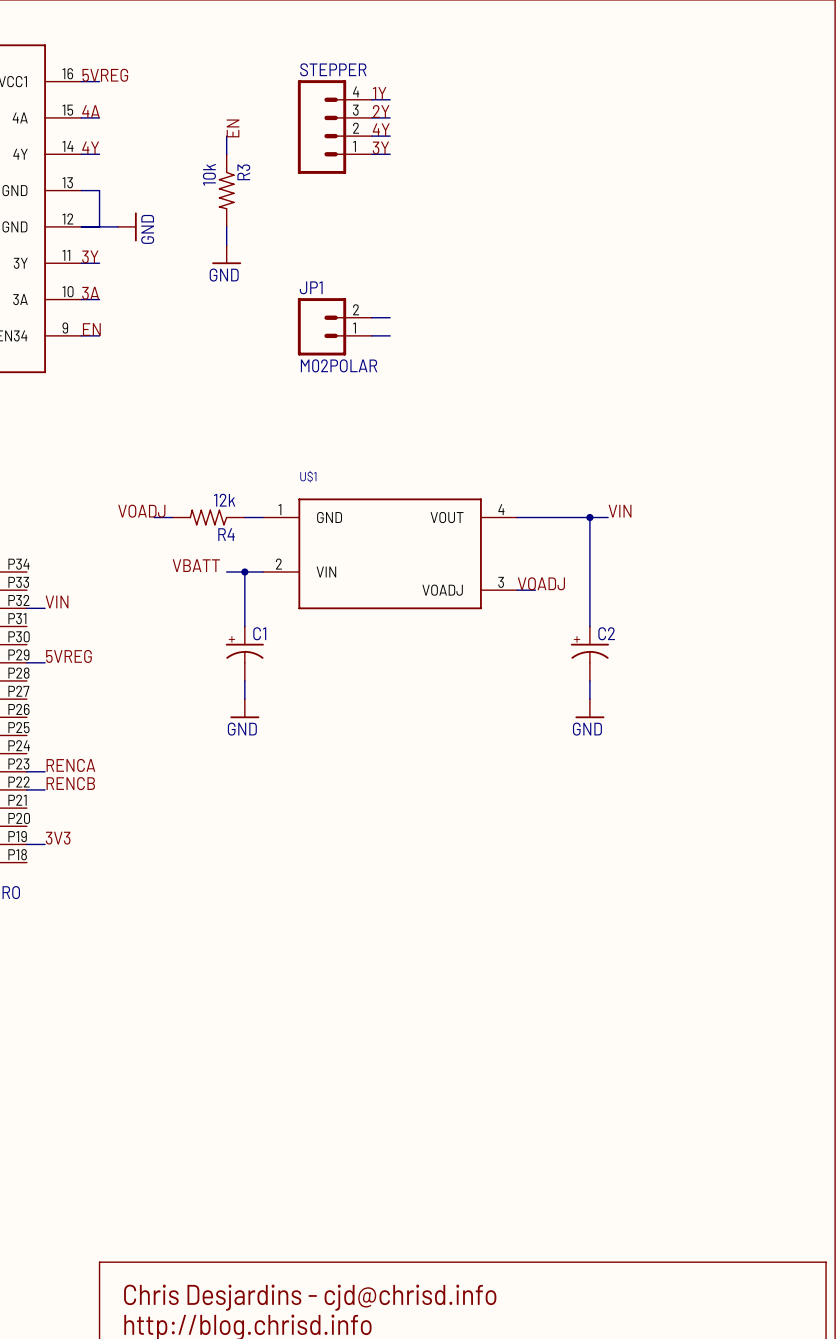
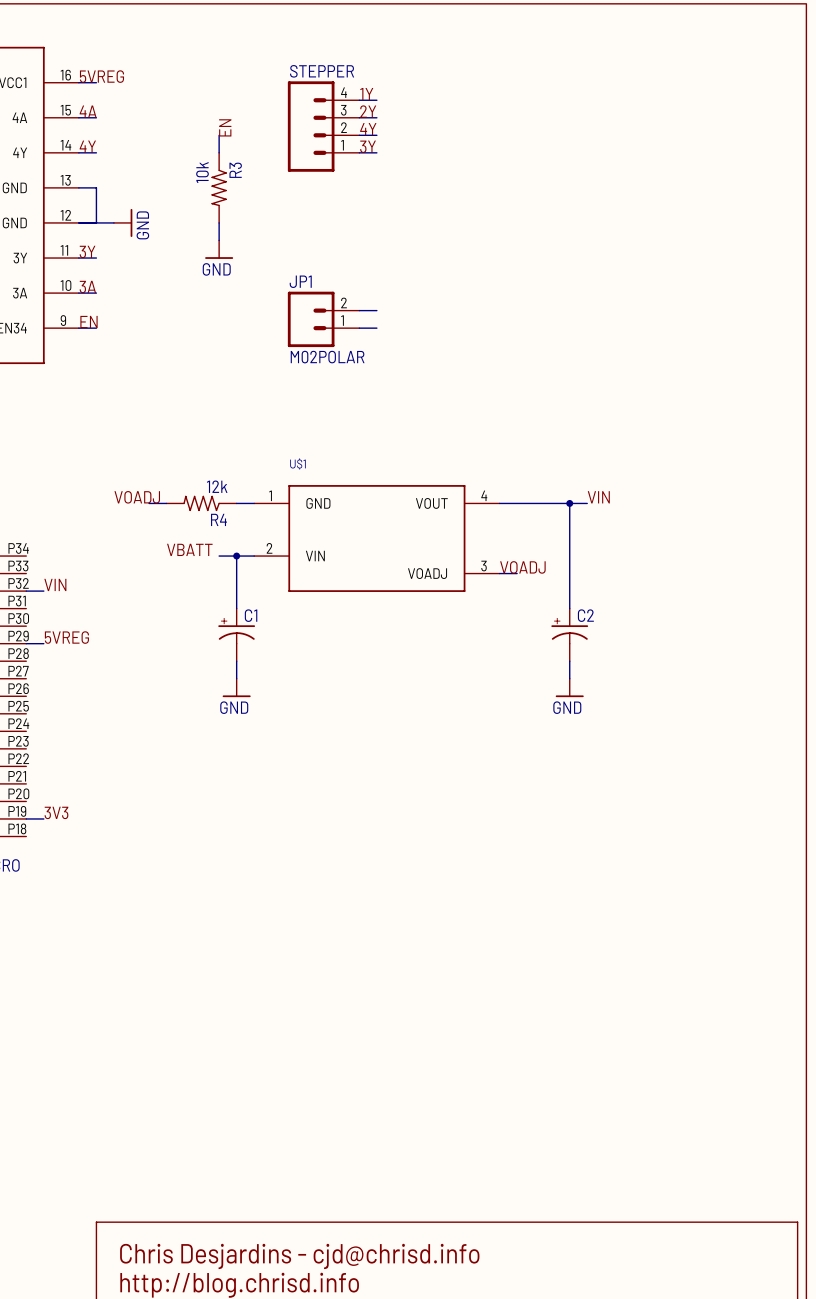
label: RENCA (70, 765) -> none
wire: (26, 771) (45, 771) -> none
label: RENCB (70, 783) -> none
wire: (26, 789) (45, 789) -> none

